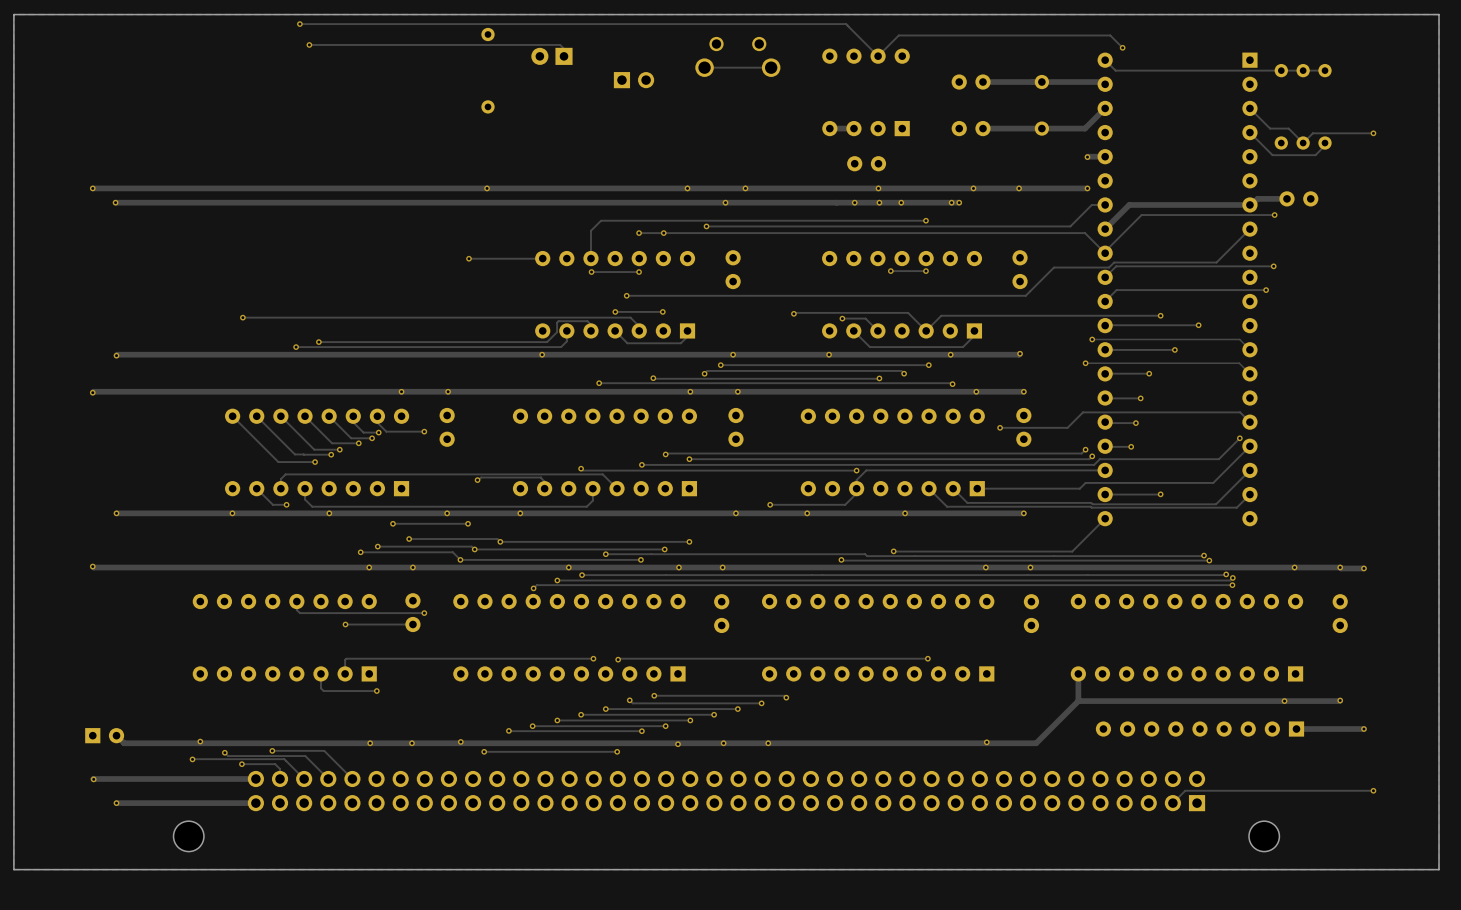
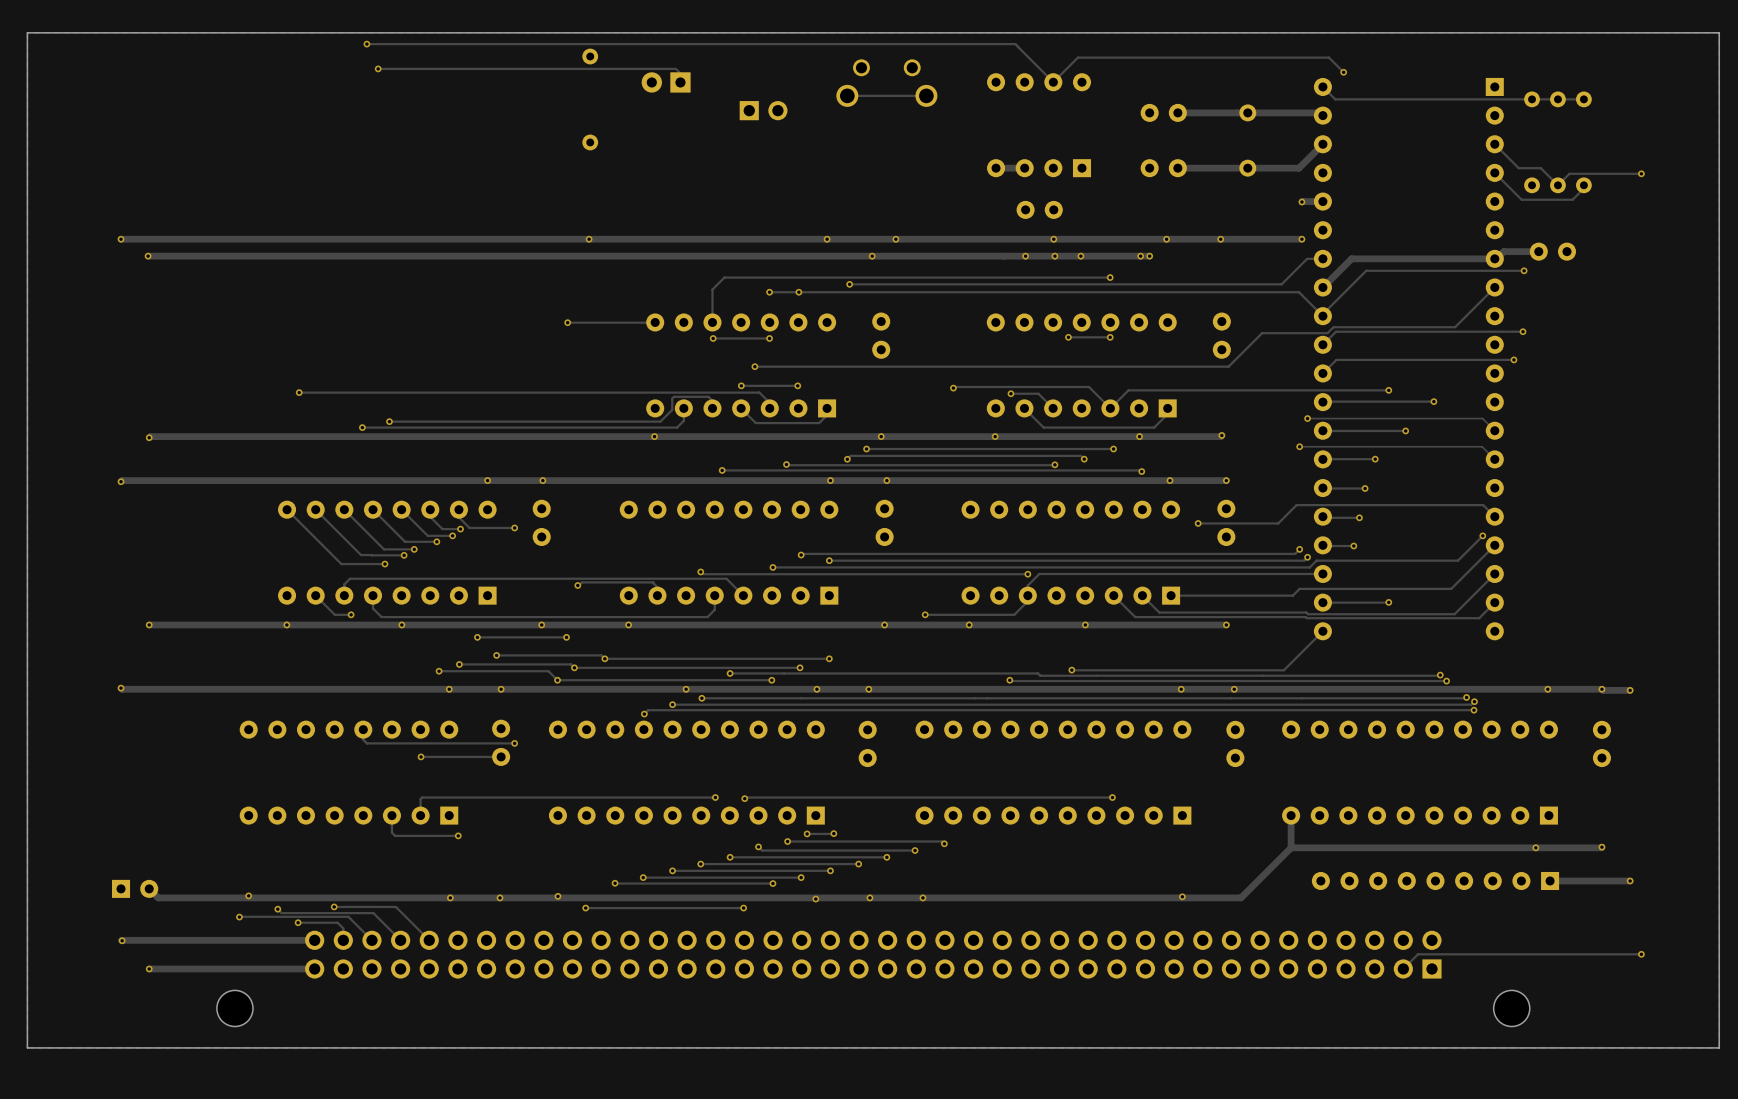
via: none -> (807, 833)
track: none -> (833, 833) (807, 833)
via: none -> (833, 833)

